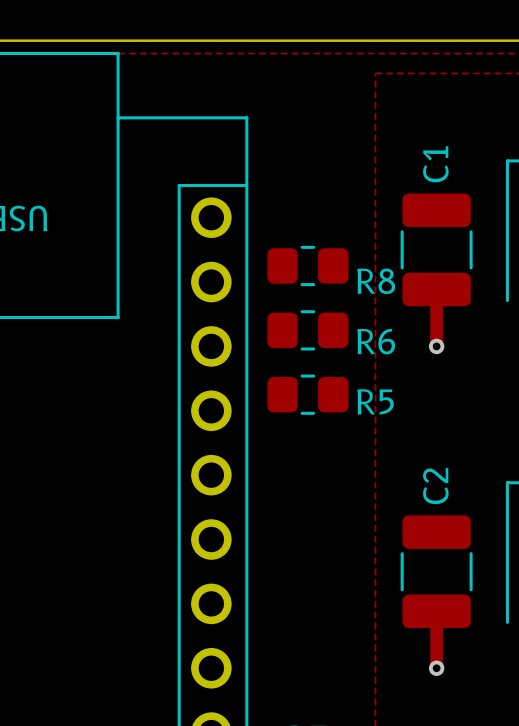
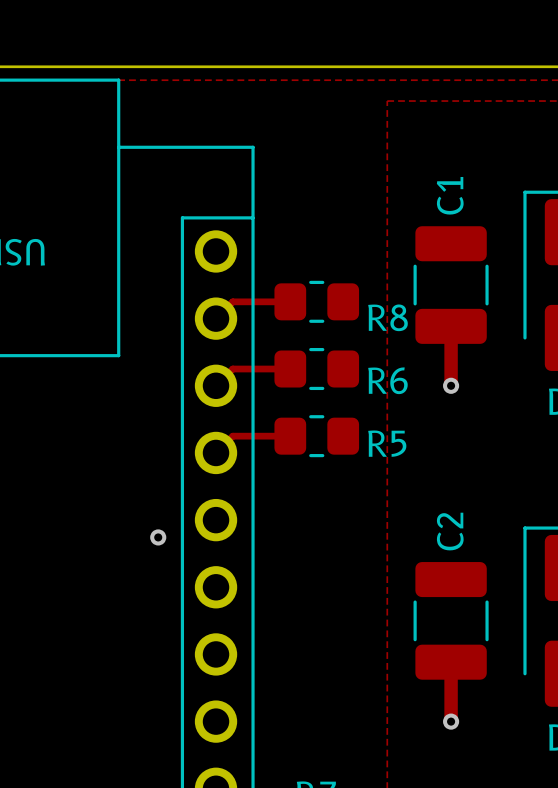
track: none -> (290, 301) (232, 301) (216, 318)
track: none -> (290, 369) (232, 369) (216, 385)
track: none -> (290, 436) (232, 436) (216, 452)
via: none -> (158, 537)

